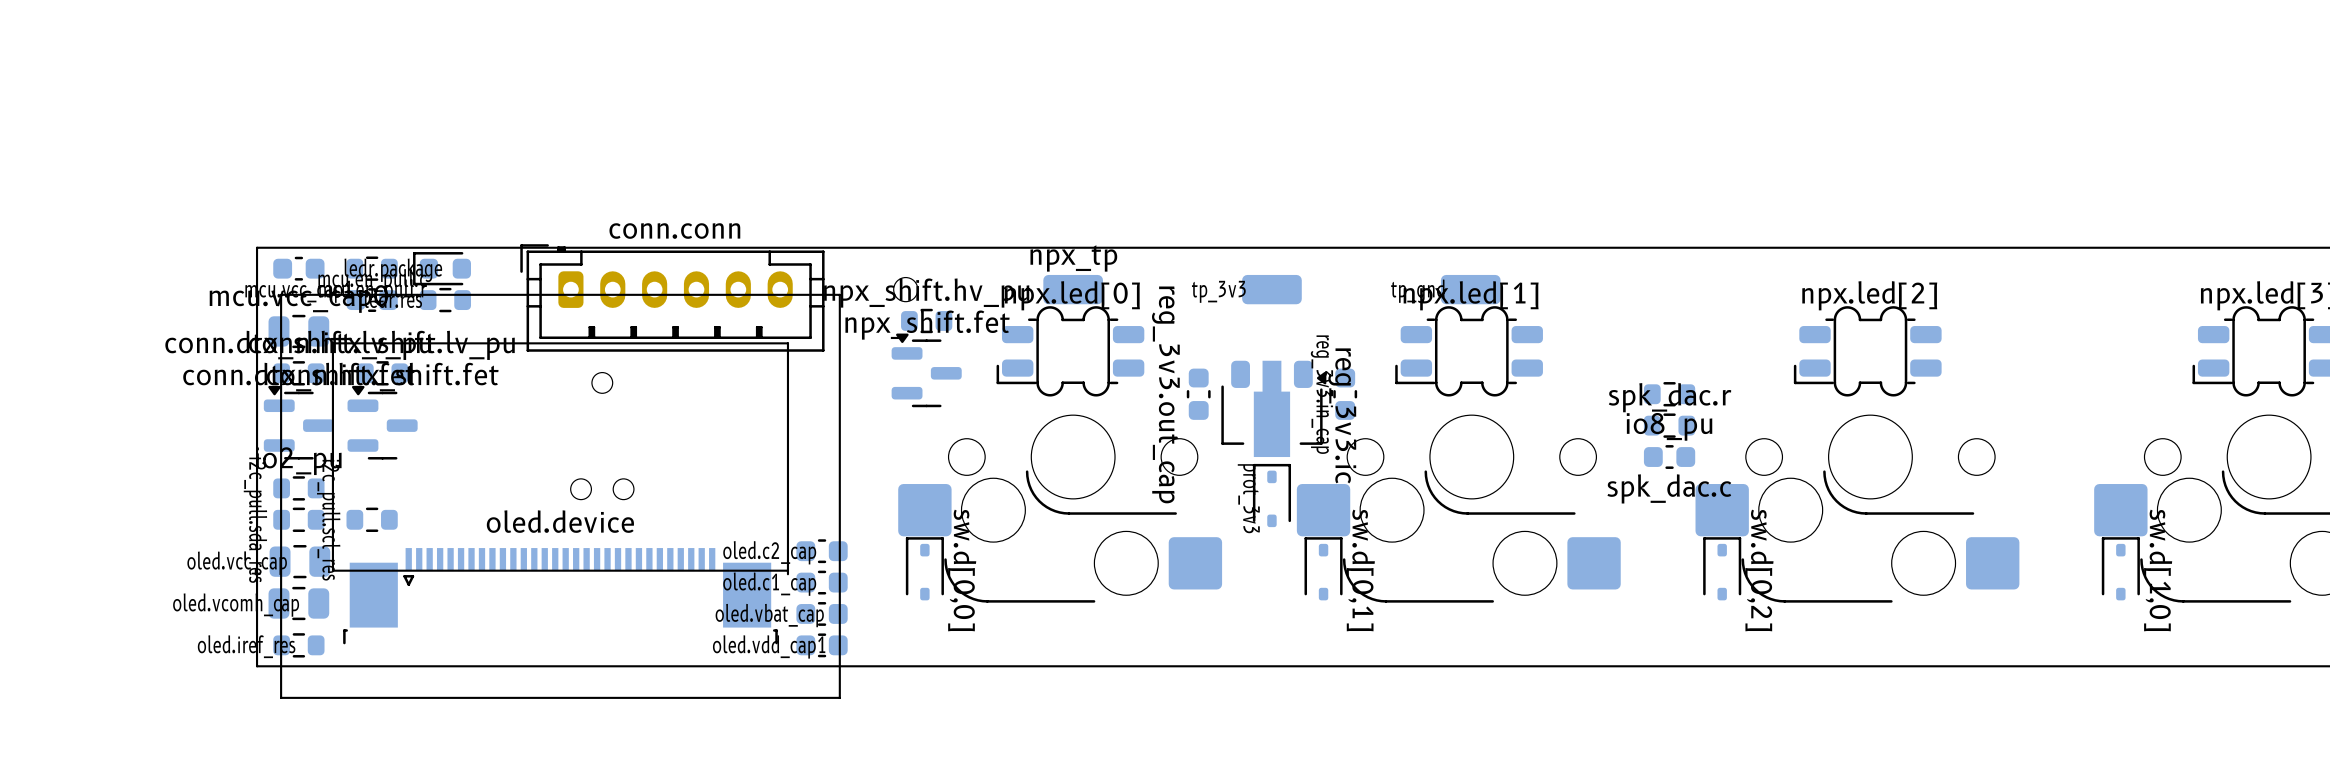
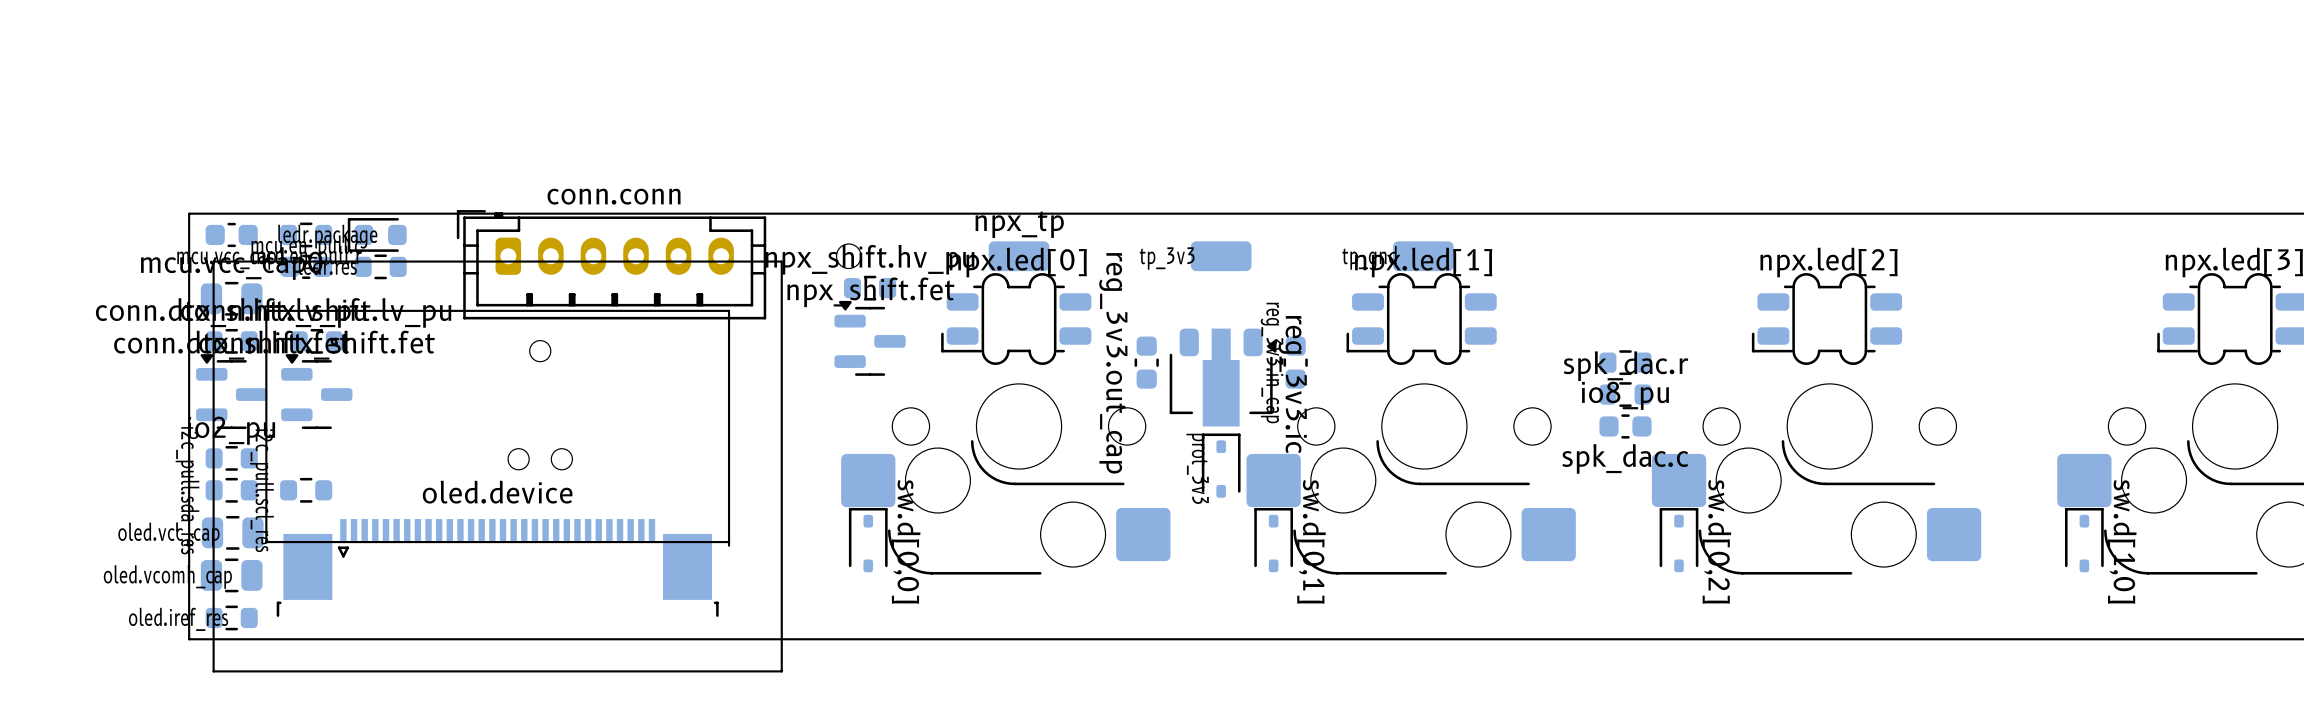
oled.c2_cap: (822, 551) -> none
oled.c1_cap: (822, 582) -> none
oled.vbat_cap: (822, 613) -> none
oled.vdd_cap1: (822, 645) -> none

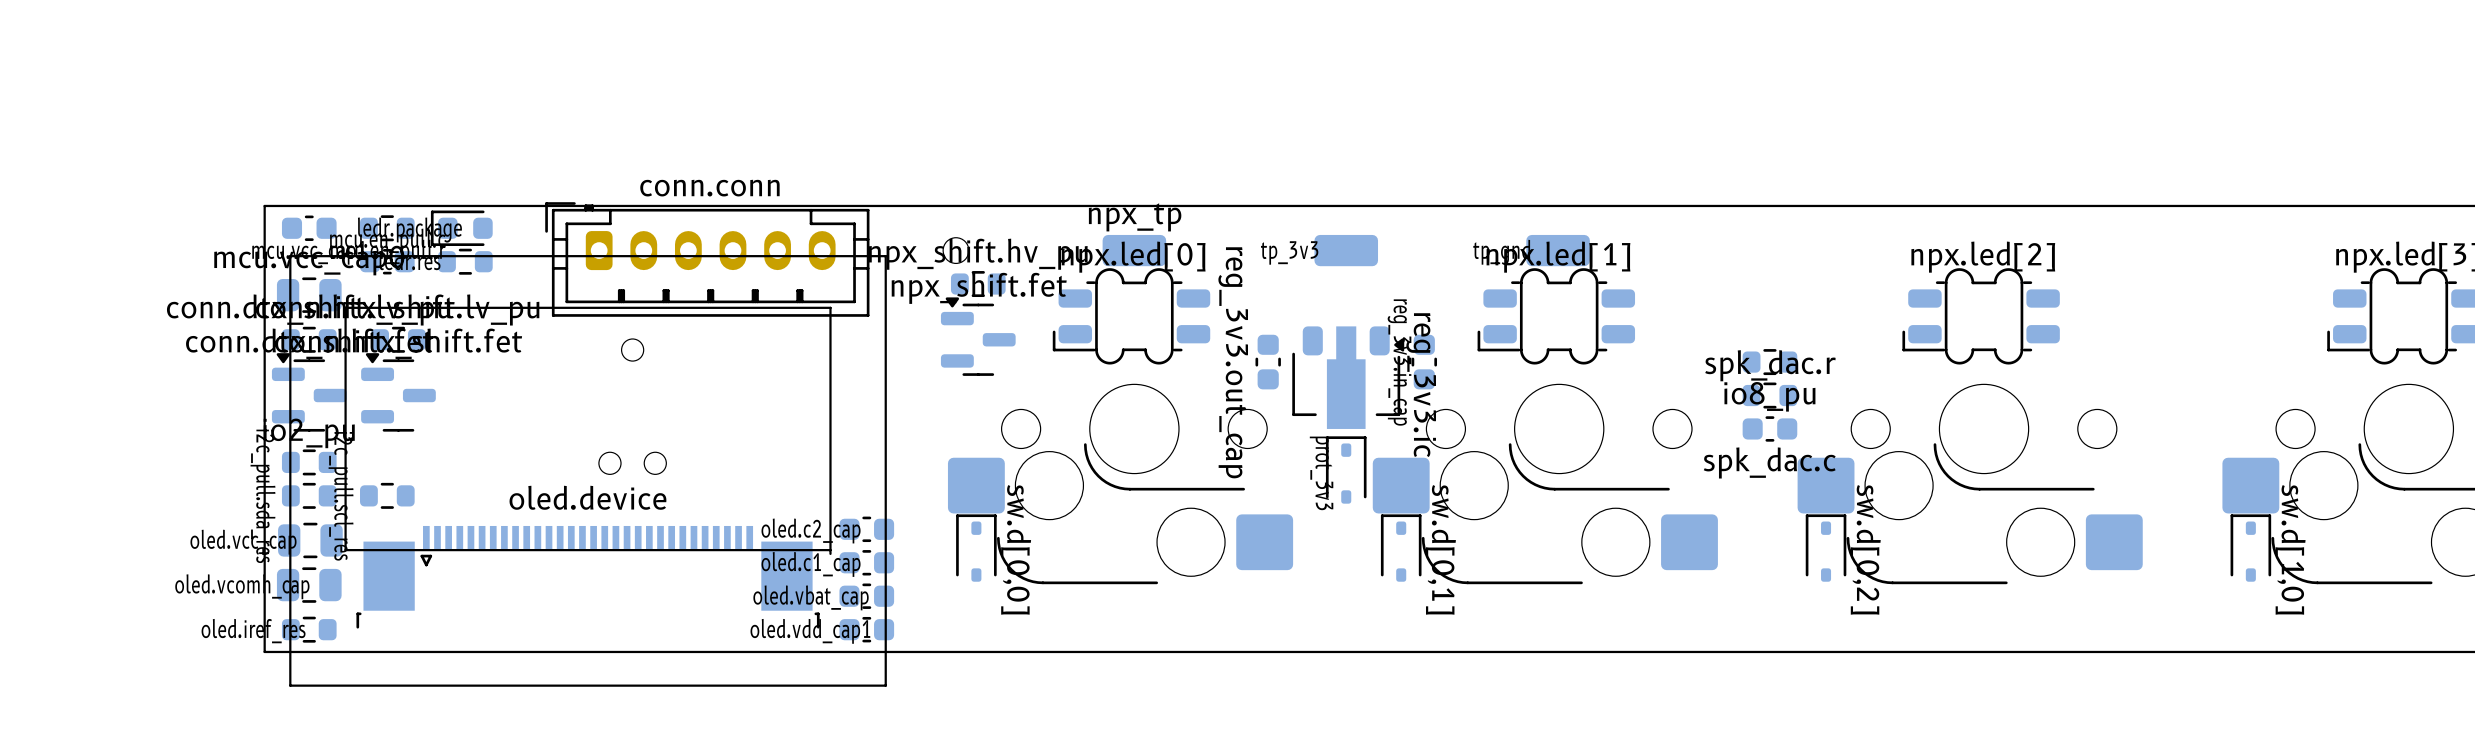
oled.c2_cap: none -> (866, 529)
oled.c1_cap: none -> (866, 562)
oled.vbat_cap: none -> (866, 596)
oled.vdd_cap1: none -> (866, 629)

